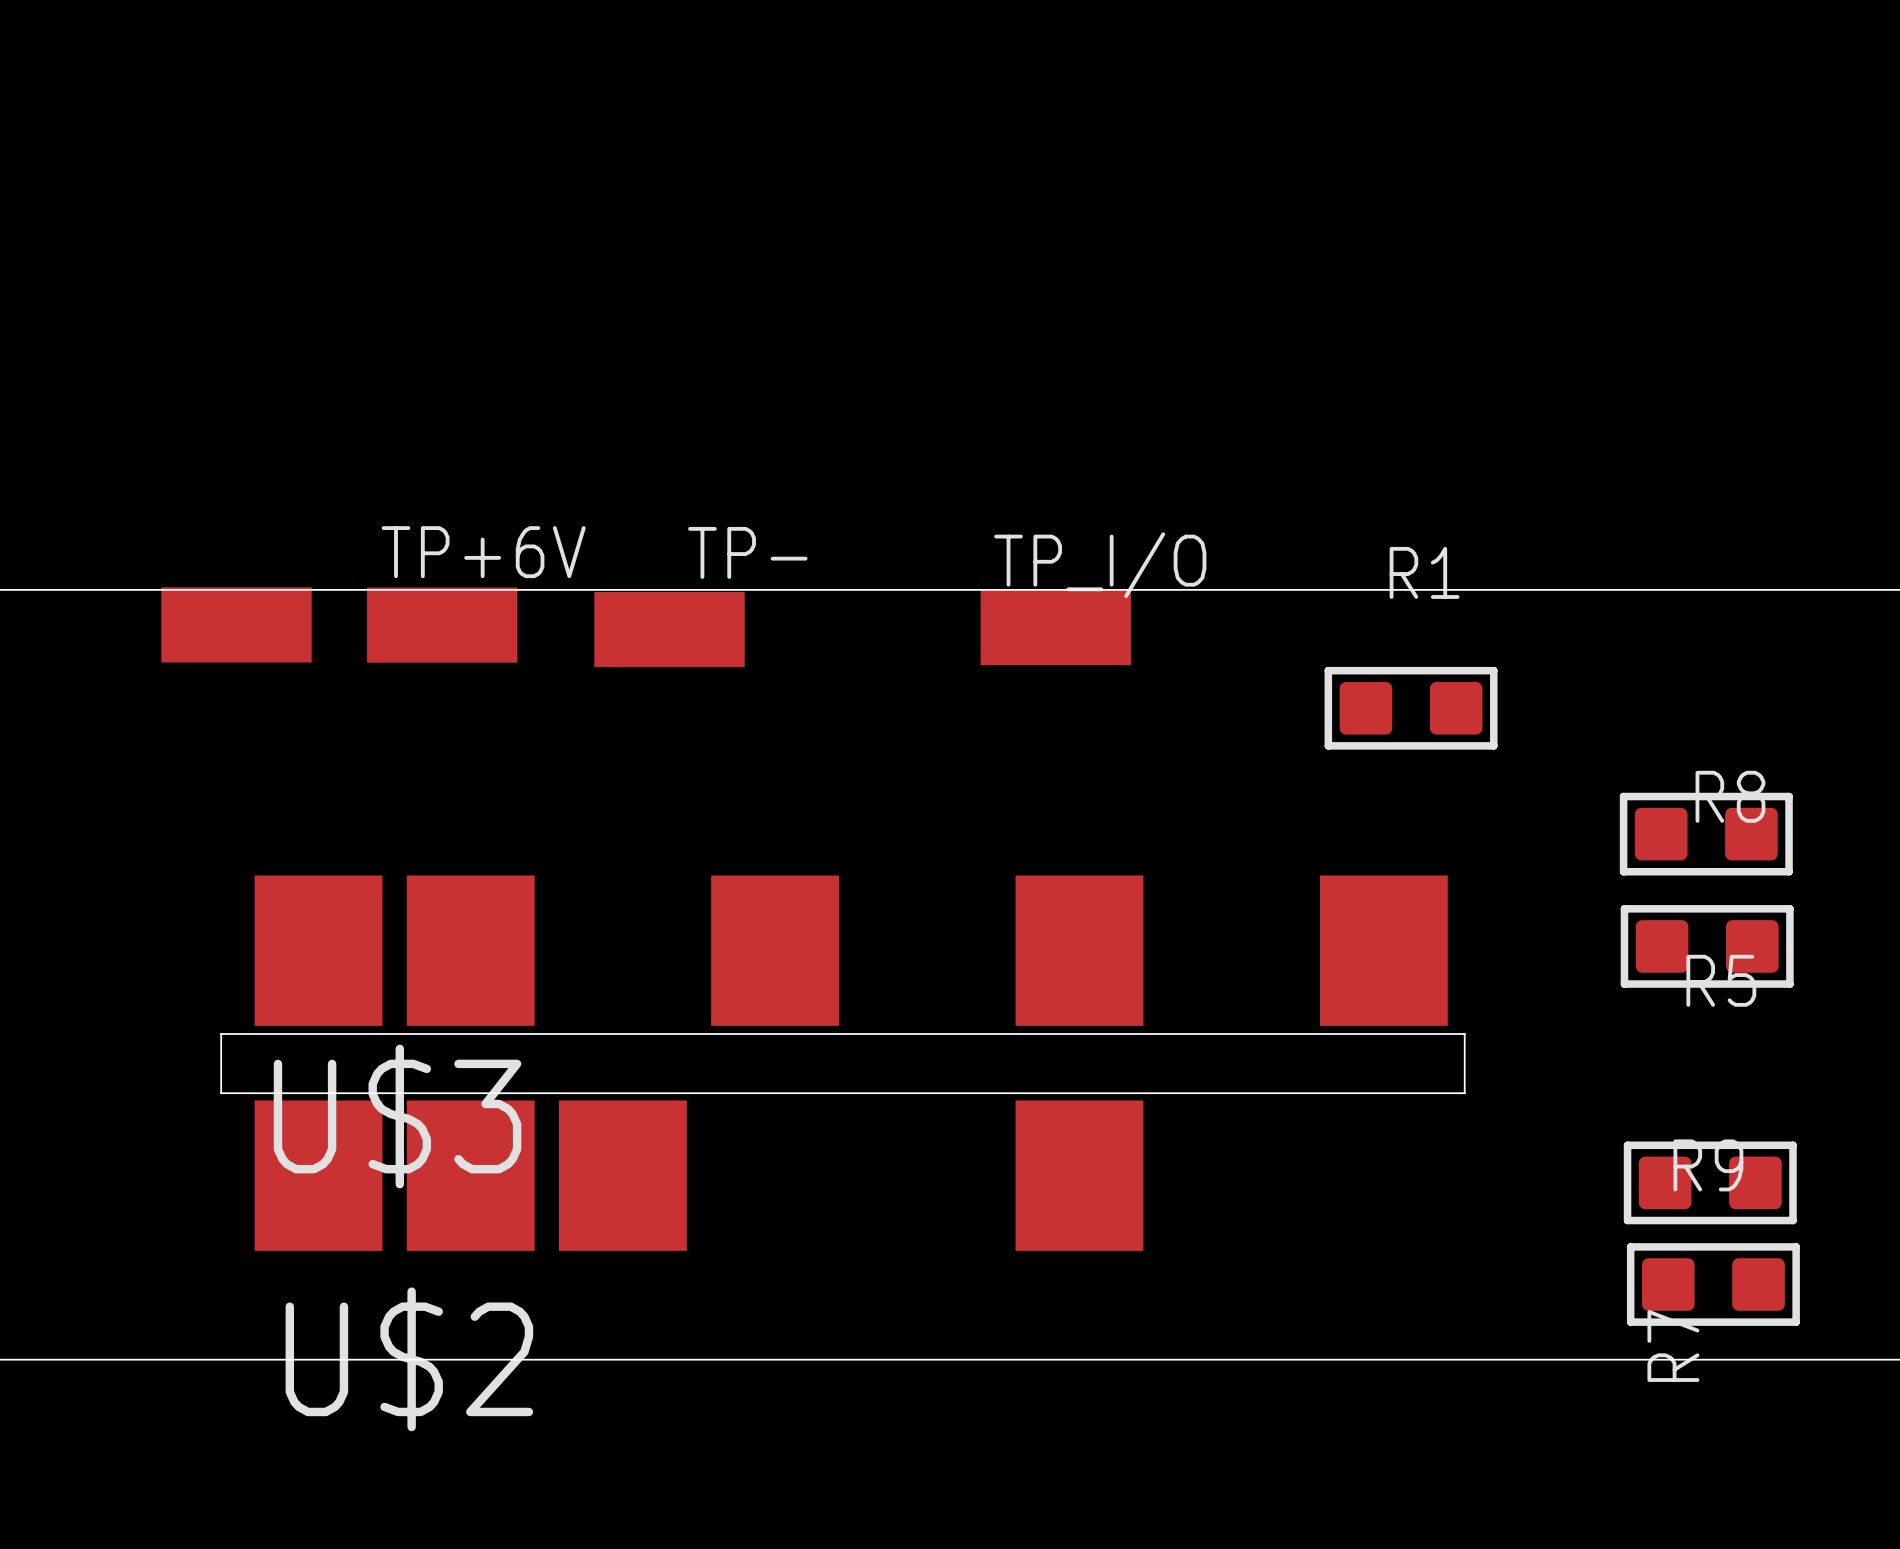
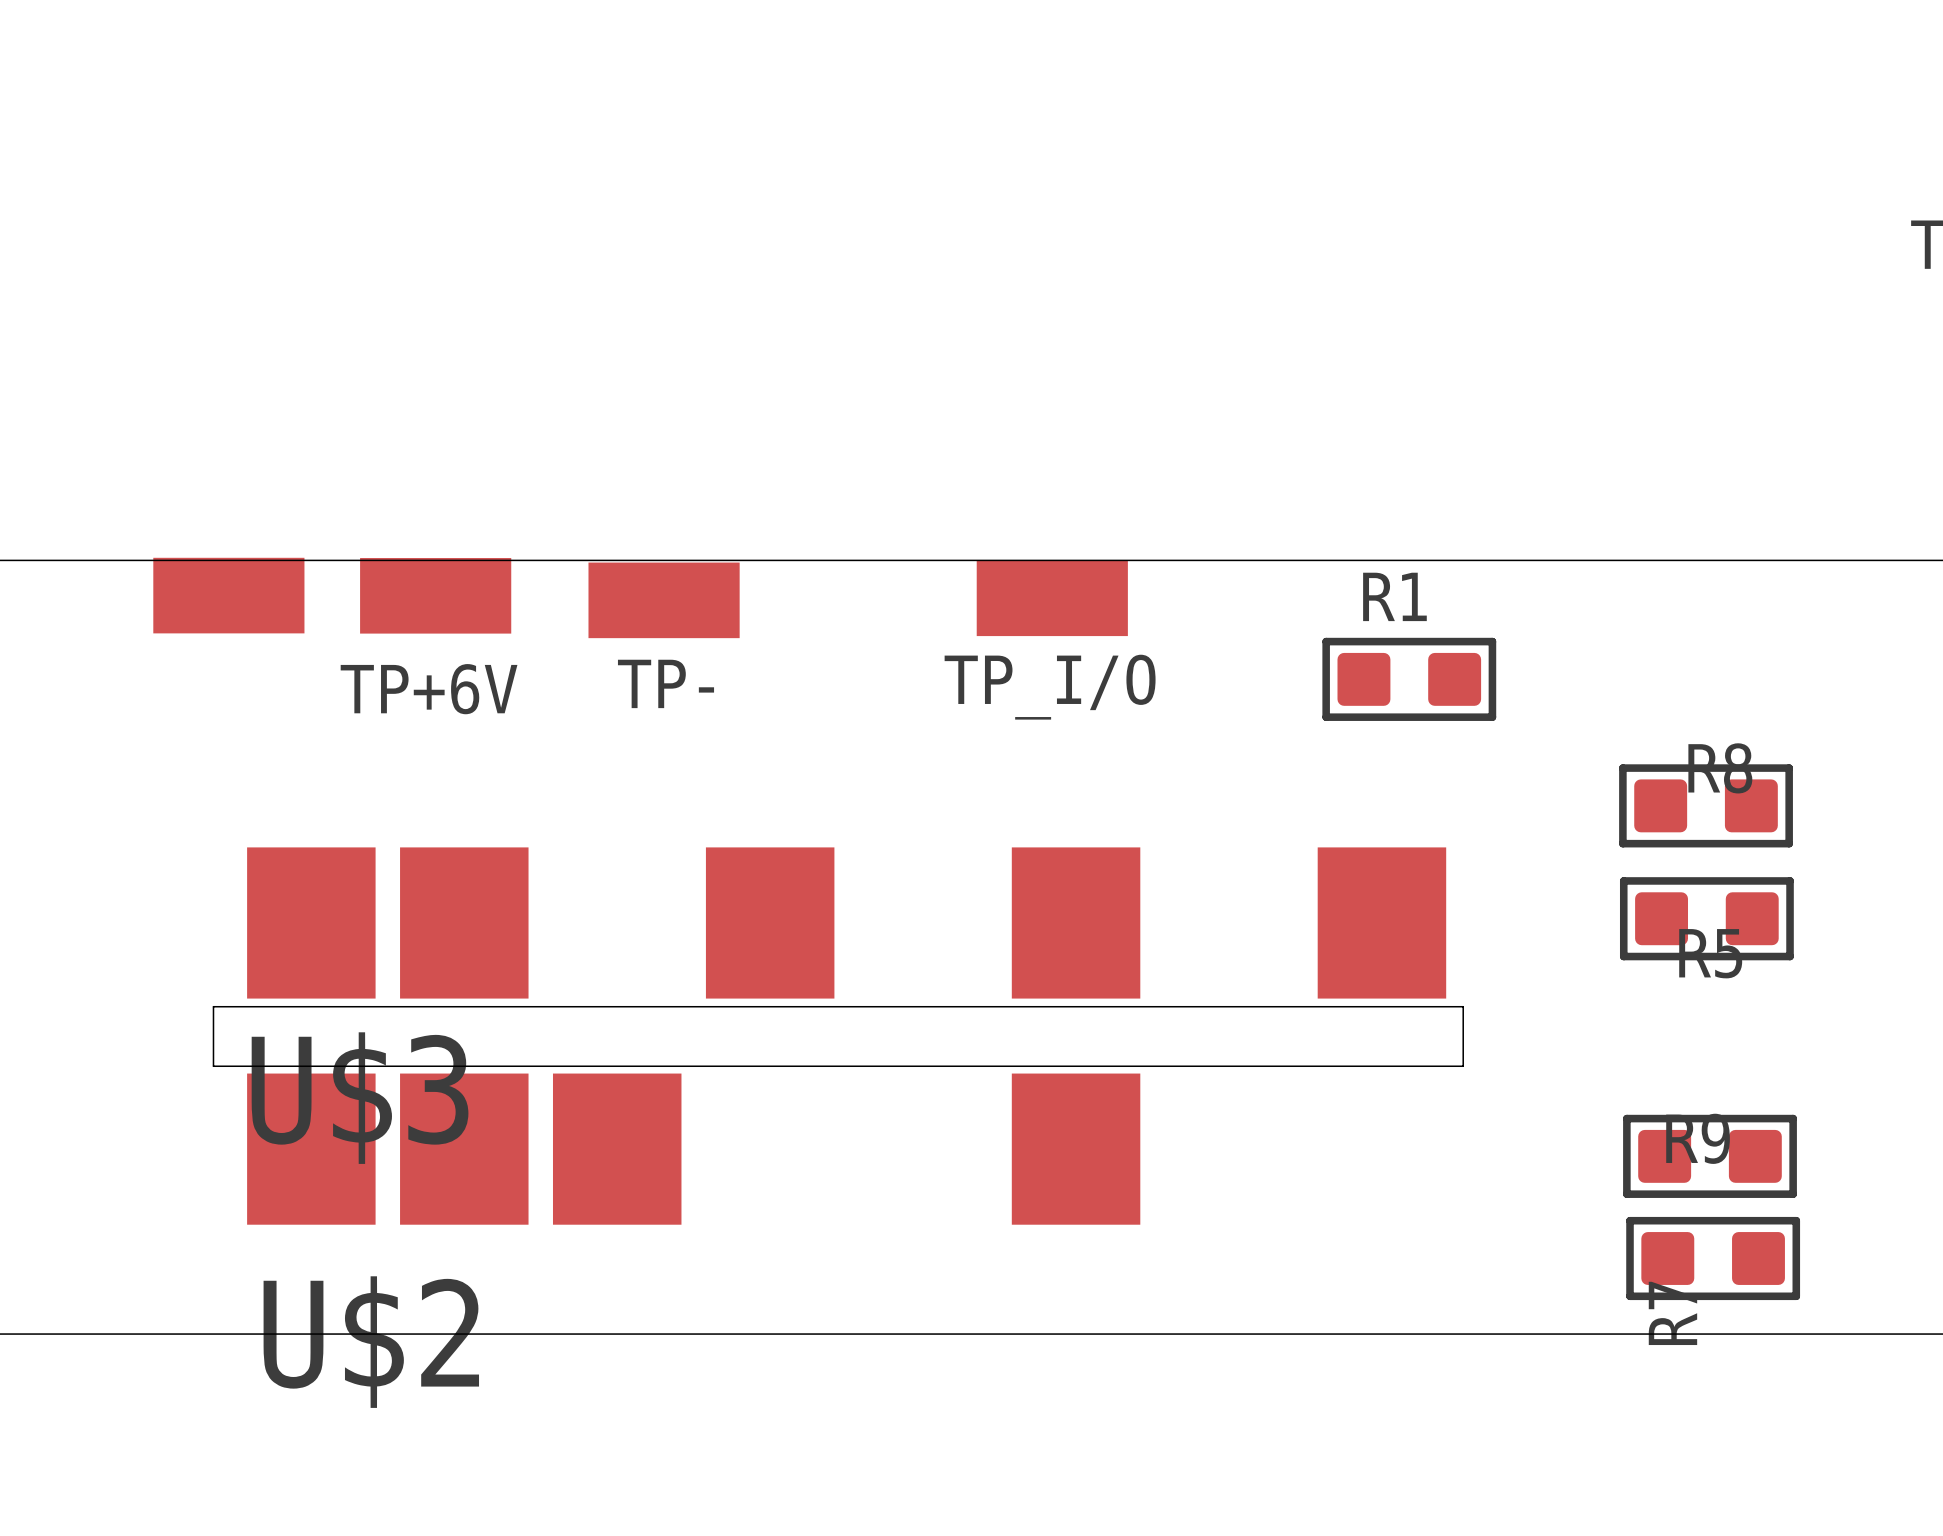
TP+6V name position: TP+6V (483, 552) -> TP+6V (429, 689)
TP- name position: TP- (747, 552) -> TP- (666, 683)
TP_I/O name position: TP_I/O (1100, 565) -> TP_I/O (1050, 687)
R1 name position: R1 (1424, 572) -> R1 (1394, 596)

